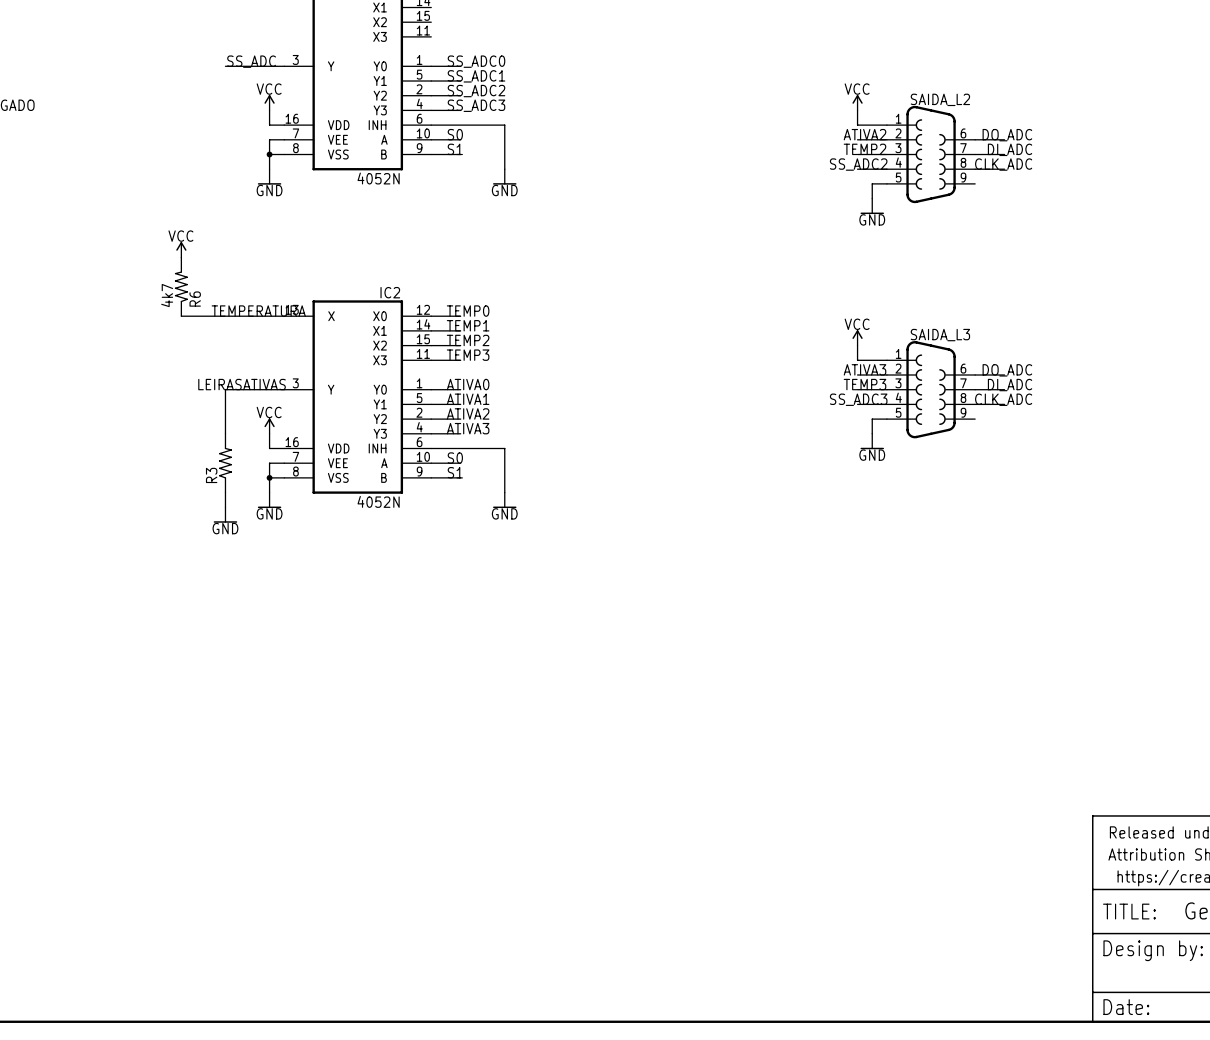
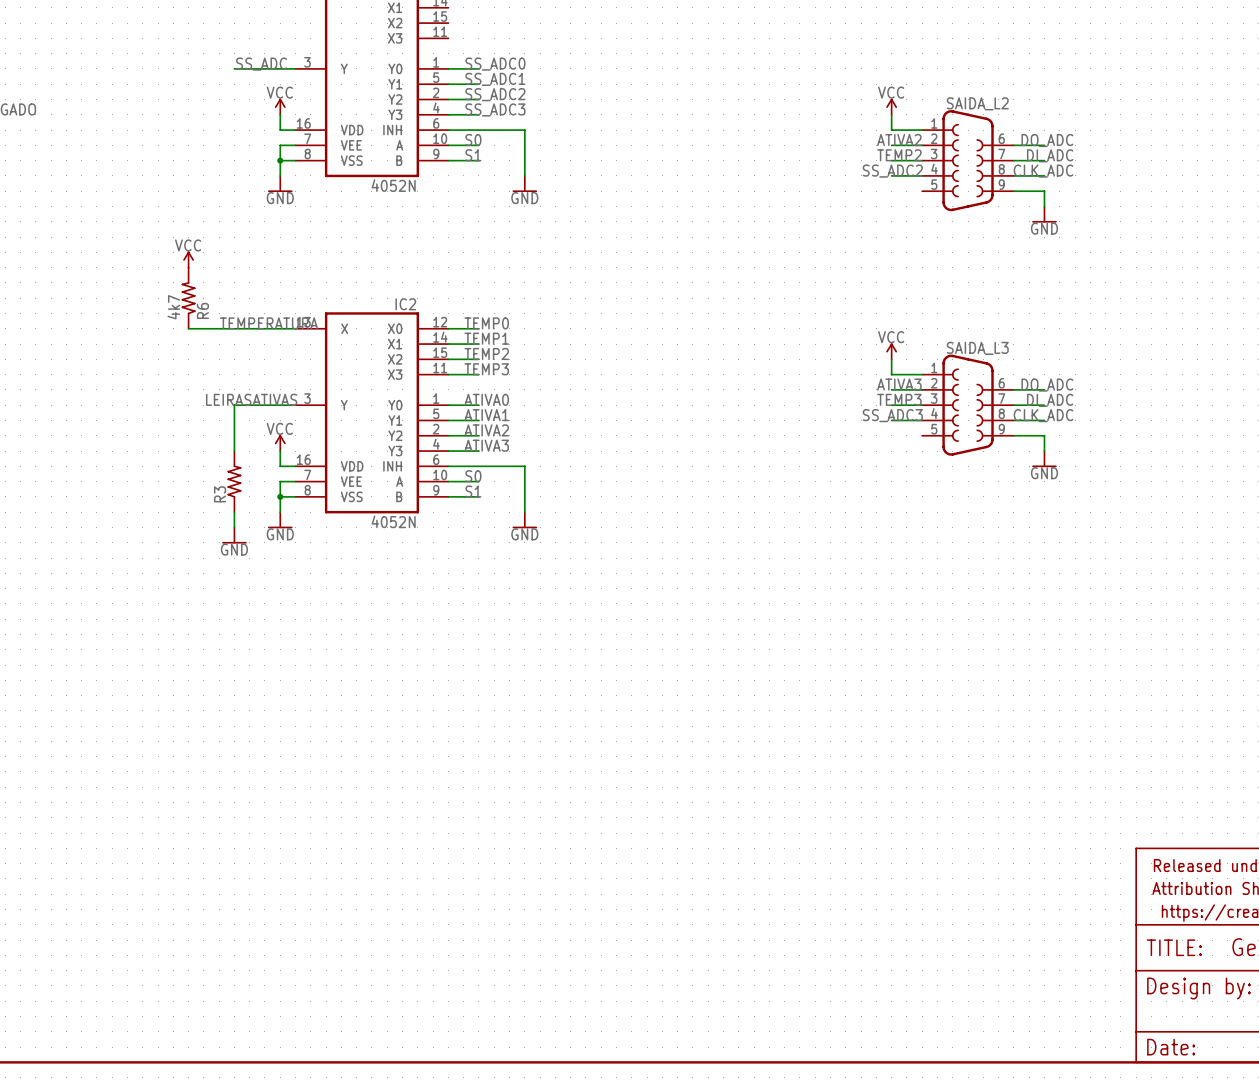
wire: (886, 183) (872, 183) (872, 198) -> none
wire: none -> (1013, 191) (1044, 191) (1044, 206)
power symbol position: GND (872, 206) -> GND (1044, 214)
wire: (886, 419) (872, 419) (872, 433) -> none
wire: none -> (1013, 435) (1044, 435) (1044, 451)
power symbol position: GND (872, 441) -> GND (1044, 459)

